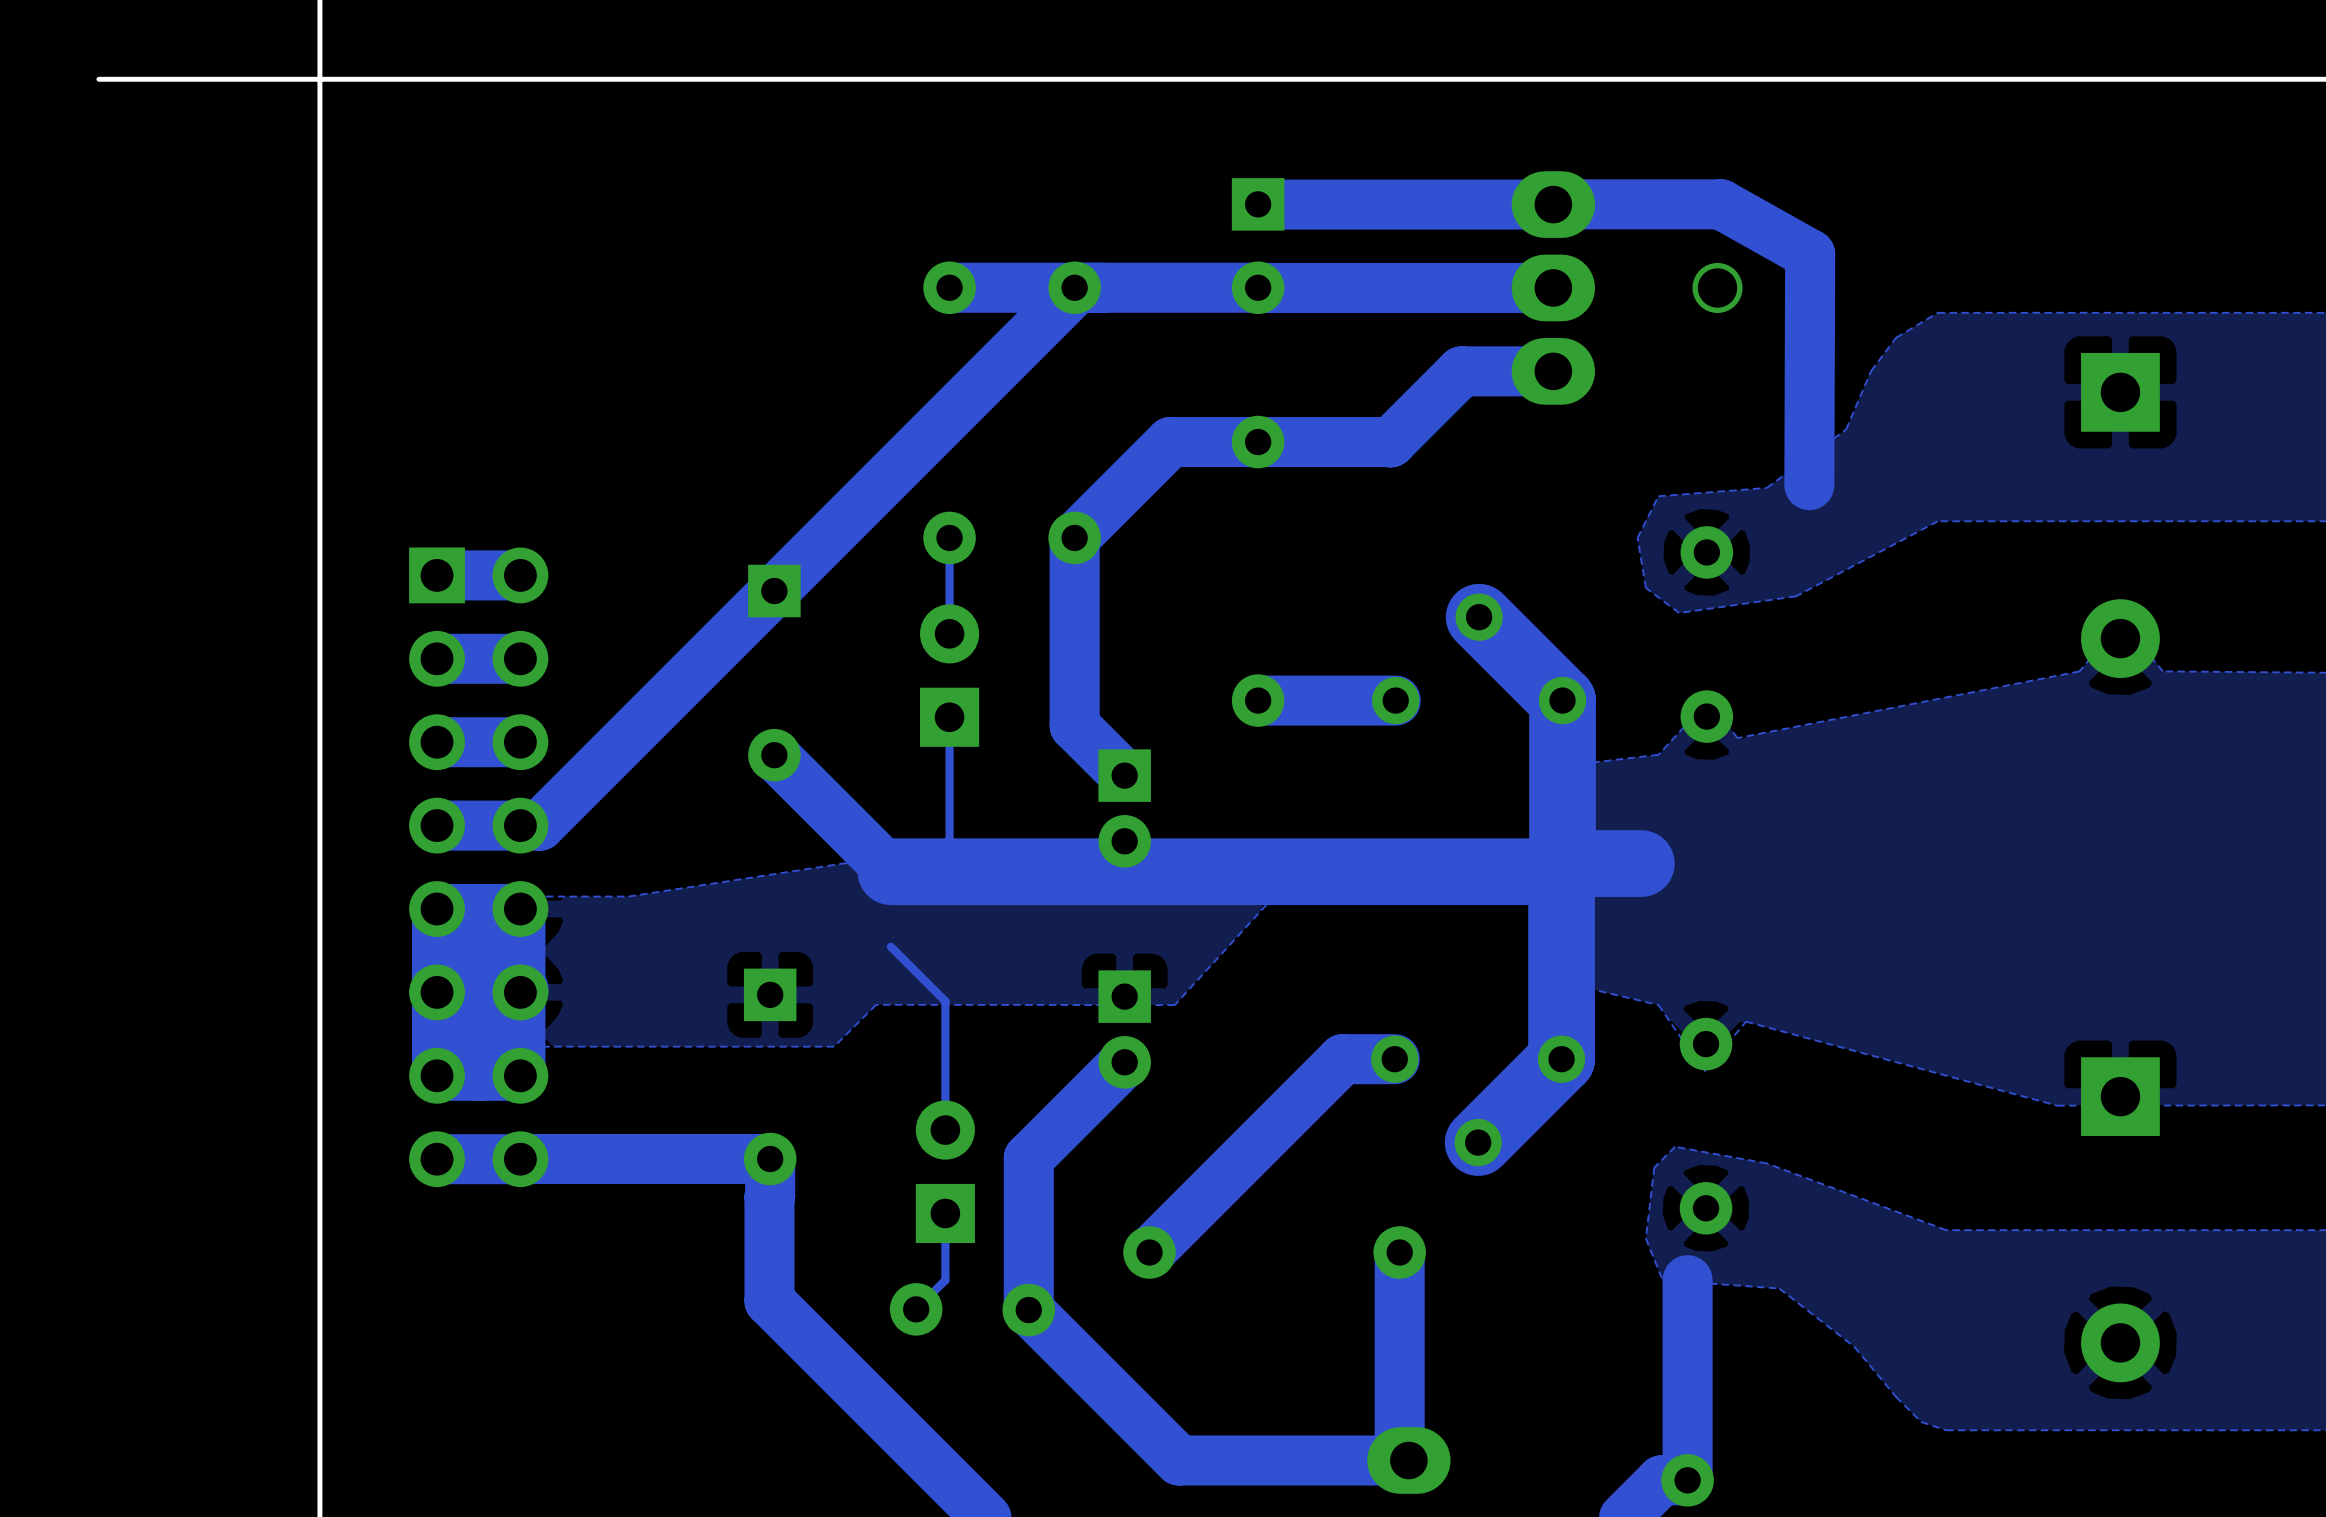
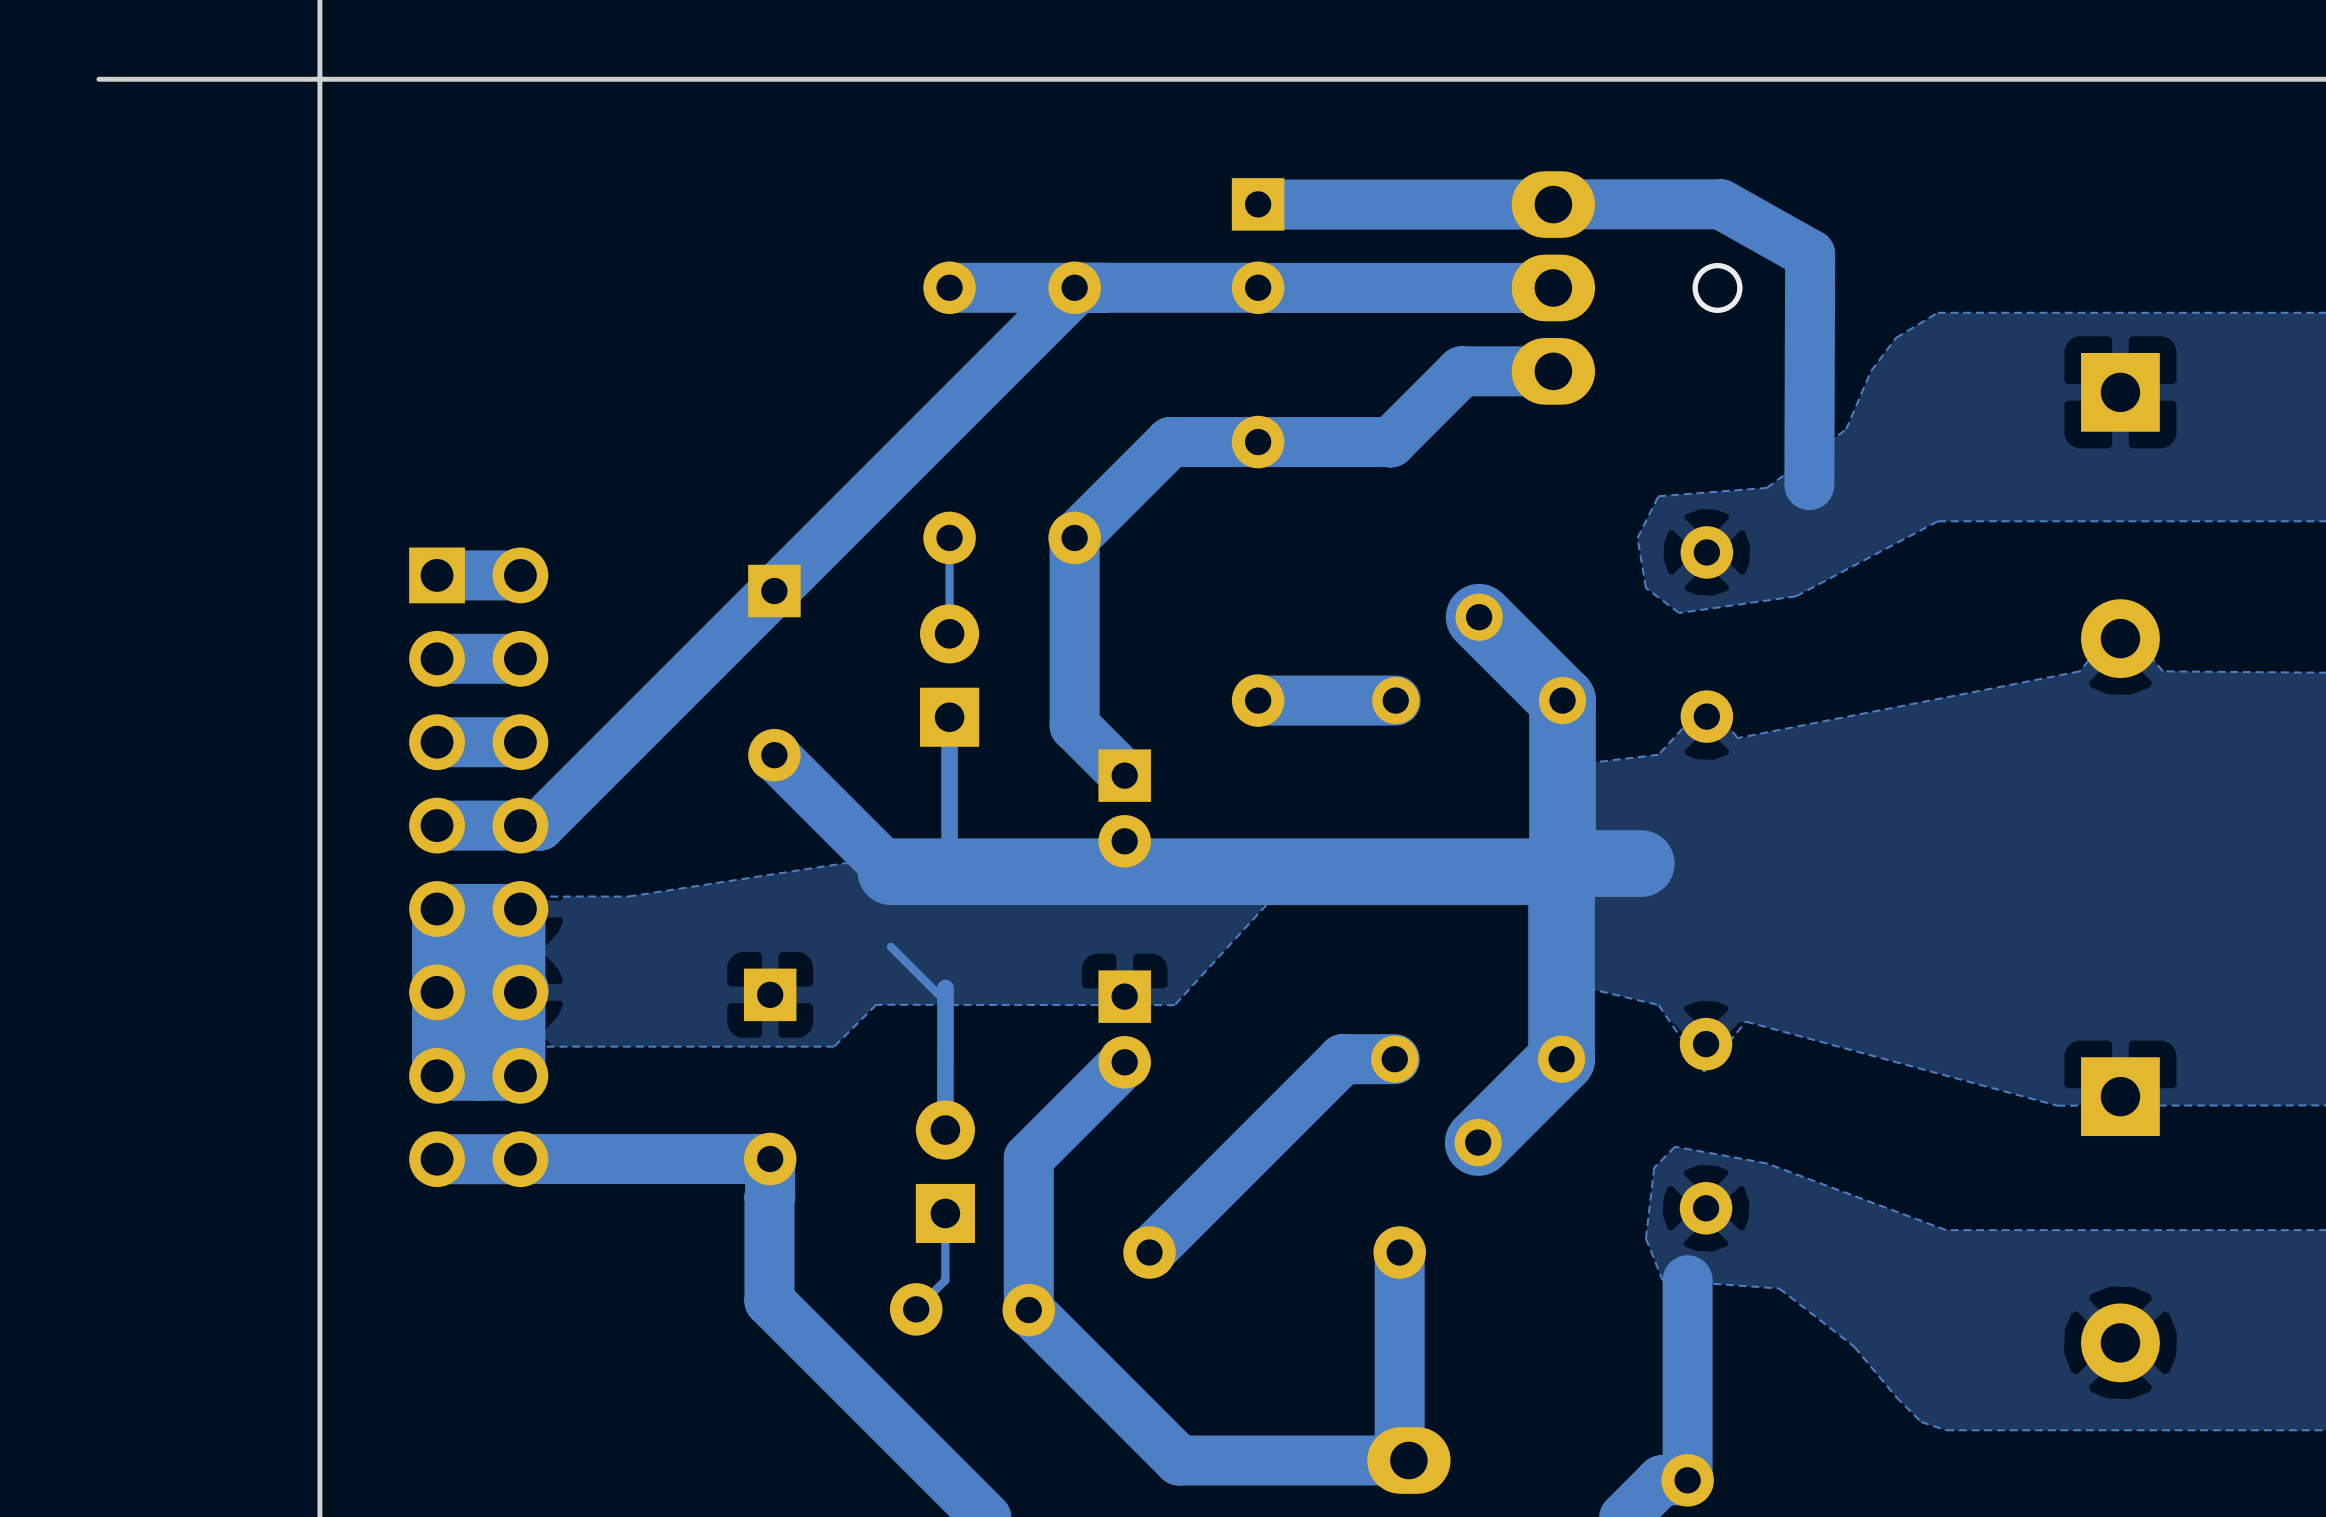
track width: thin (949, 717) (949, 871) -> thick (949, 717) (949, 871)
track: none -> (945, 987) (945, 1130)

